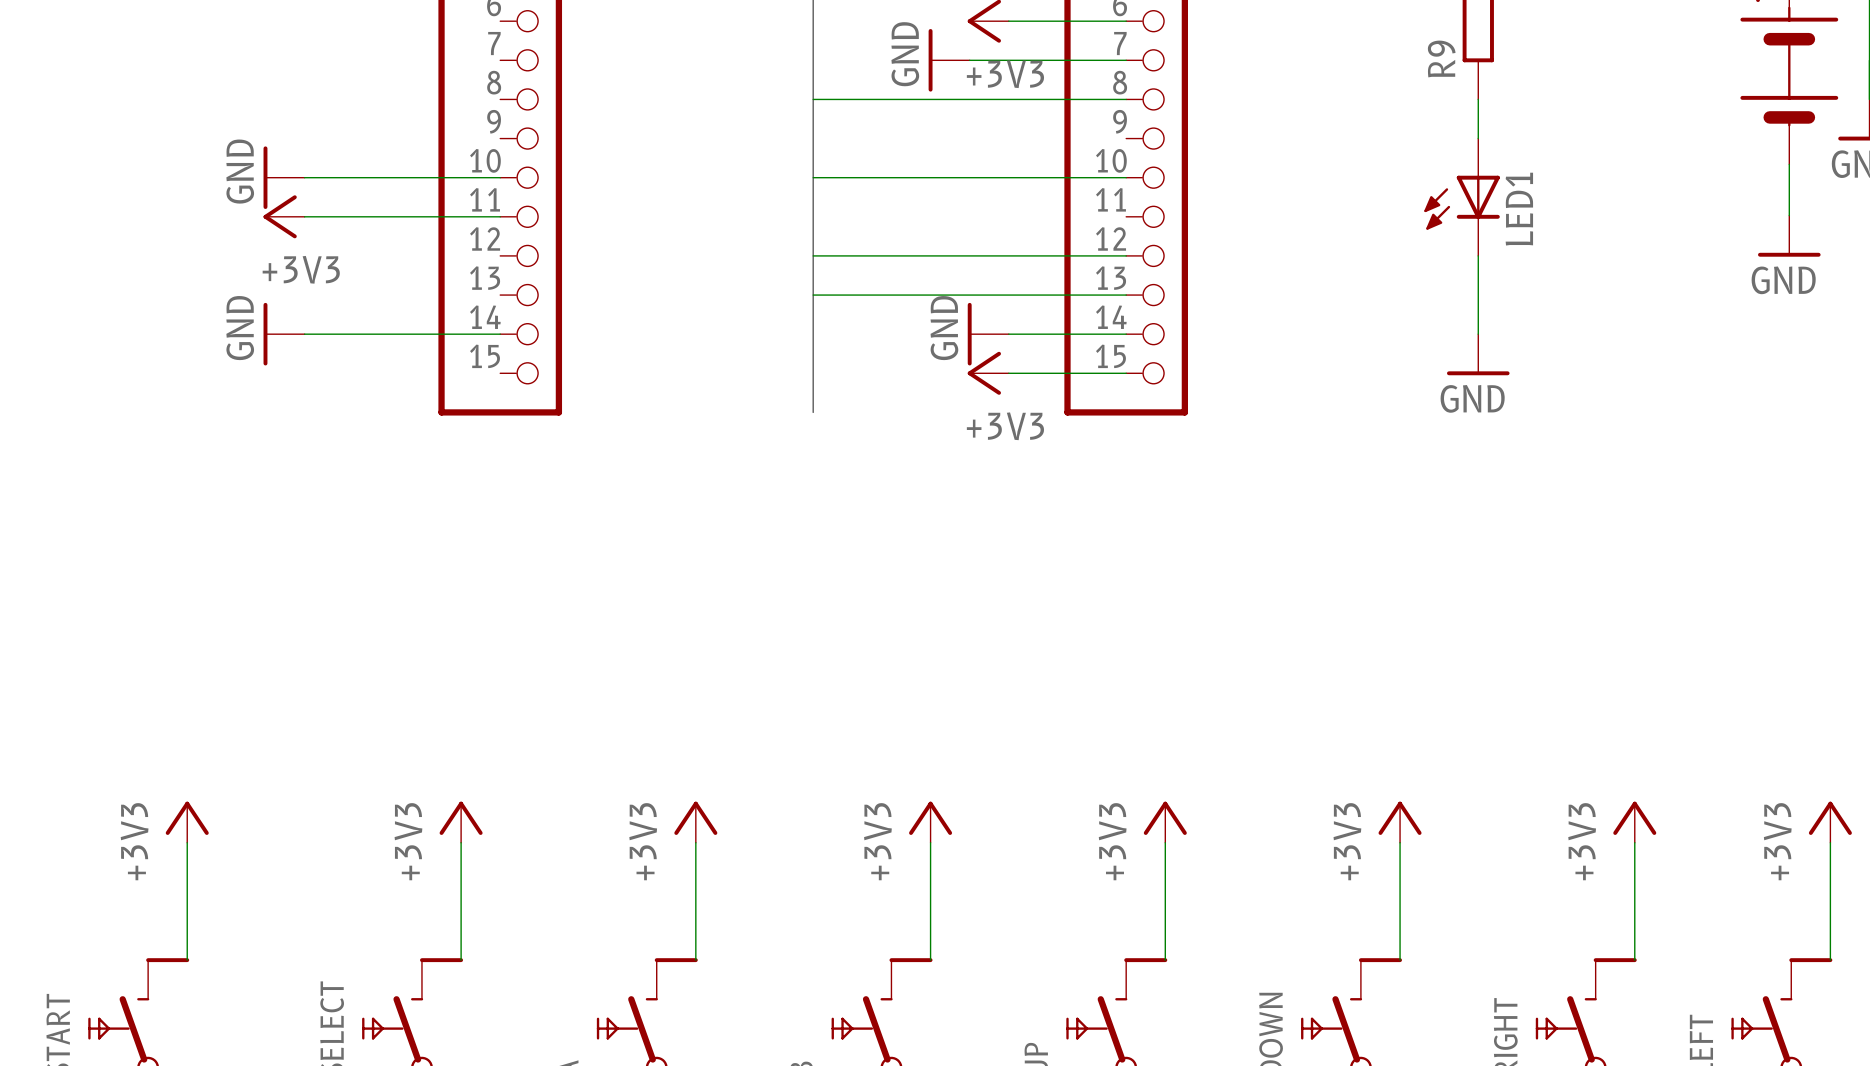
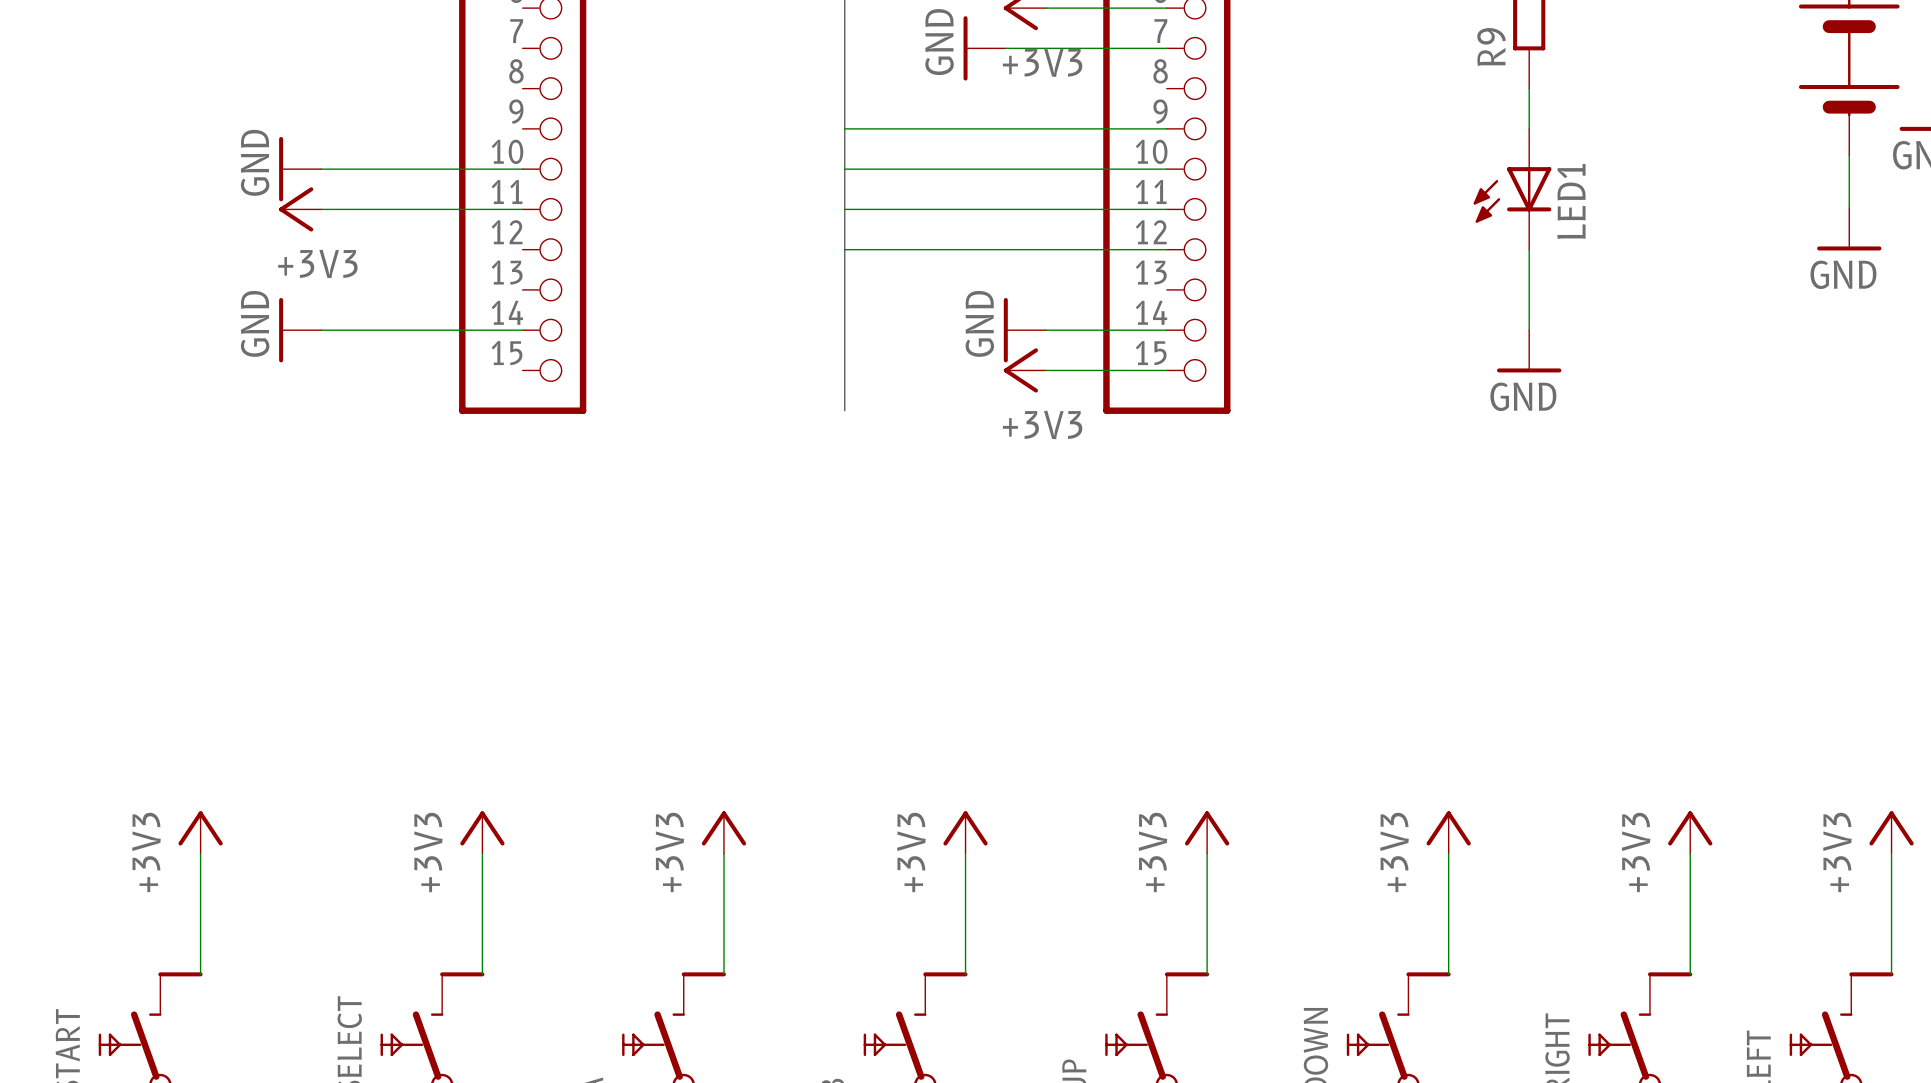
wire: (813, 99) (1126, 99) -> (844, 128) (1166, 128)
wire: (813, 295) (1126, 295) -> (844, 209) (1166, 209)

